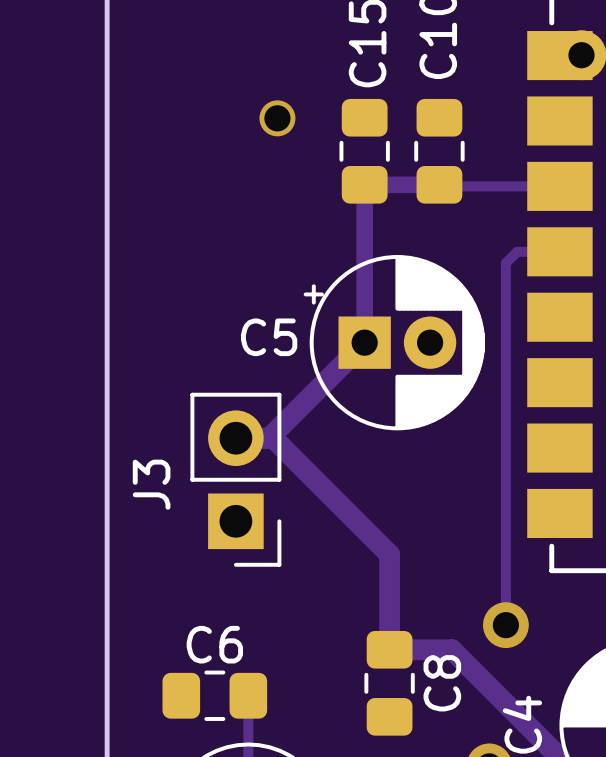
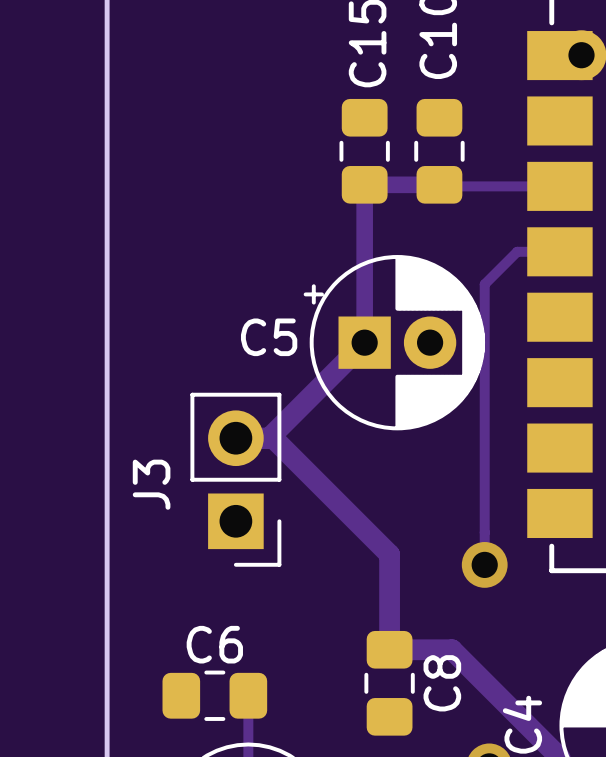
via: (277, 118) -> none
track: (505, 263) (505, 625) -> (505, 263) (484, 284) (484, 564)
via position: (505, 625) -> (484, 564)

